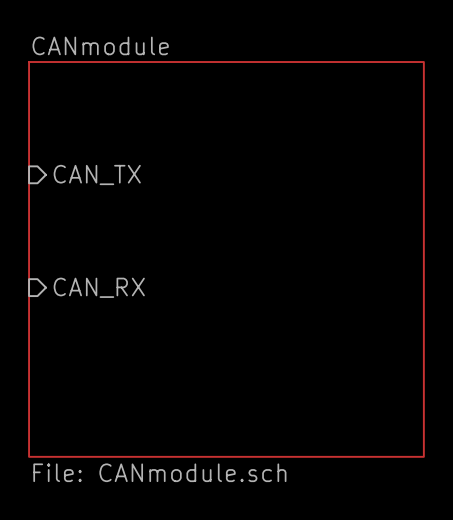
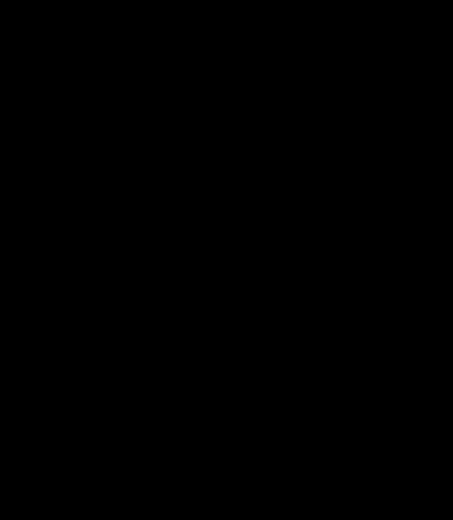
sheet pin: CAN_TX (97, 174) -> none
sheet CANmodule: File: CANmodule.sch (226, 259) -> none
sheet pin: CAN_RX (99, 287) -> none

